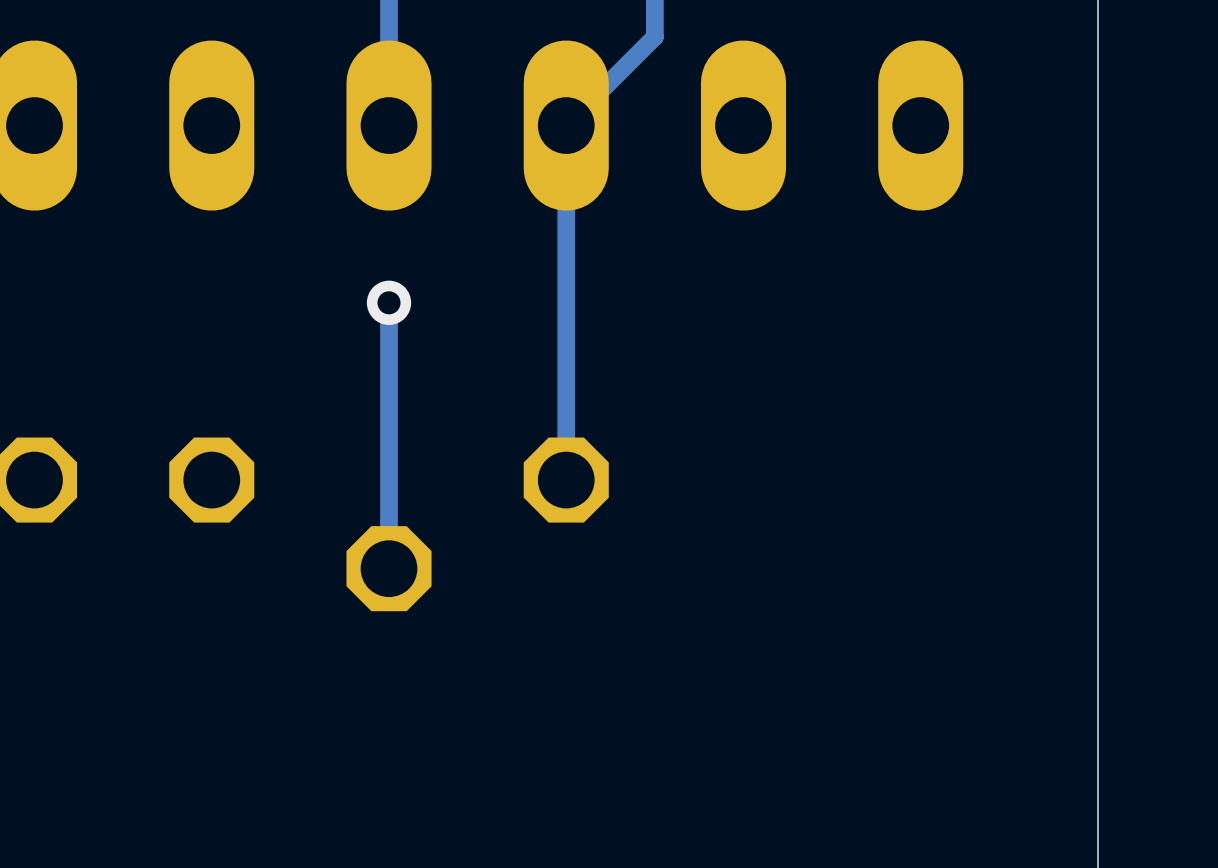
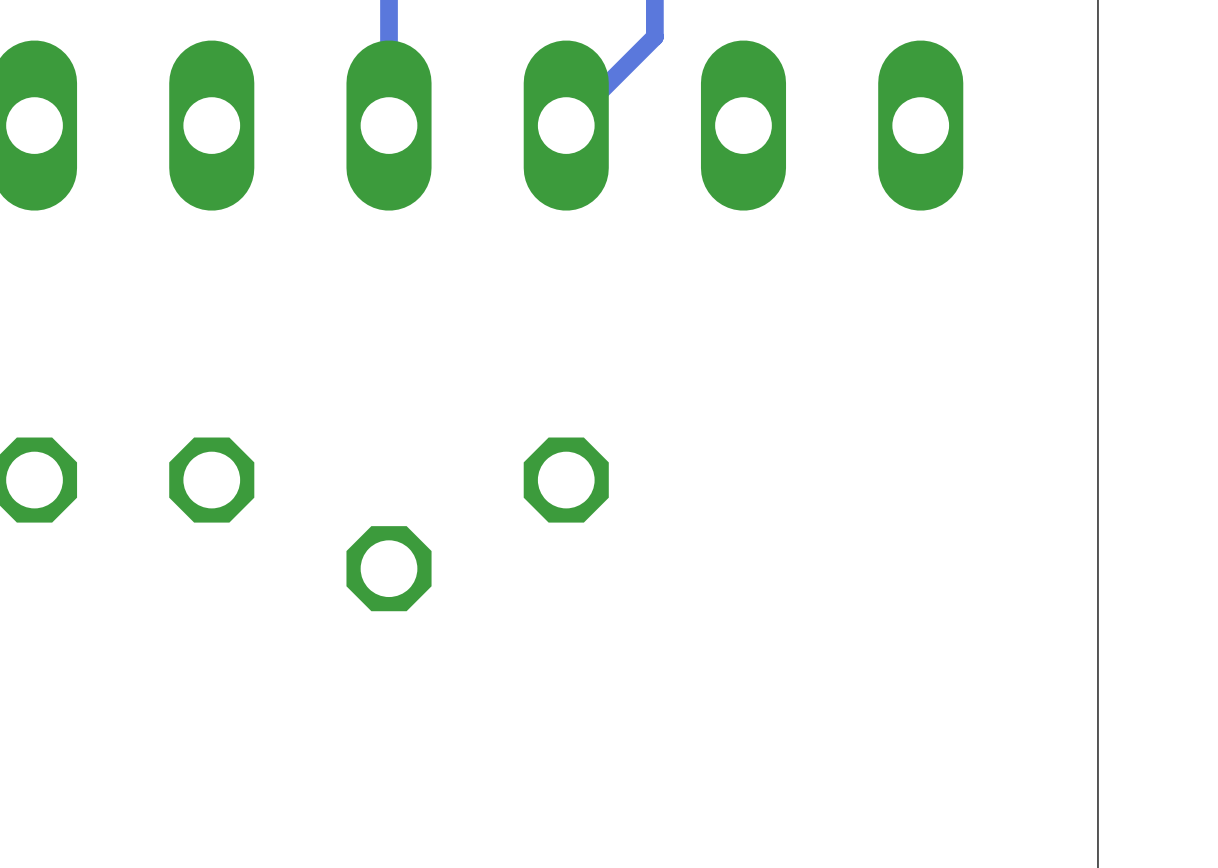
track: (566, 125) (566, 480) -> none
track: (389, 302) (389, 568) -> none
via: (389, 302) -> none

